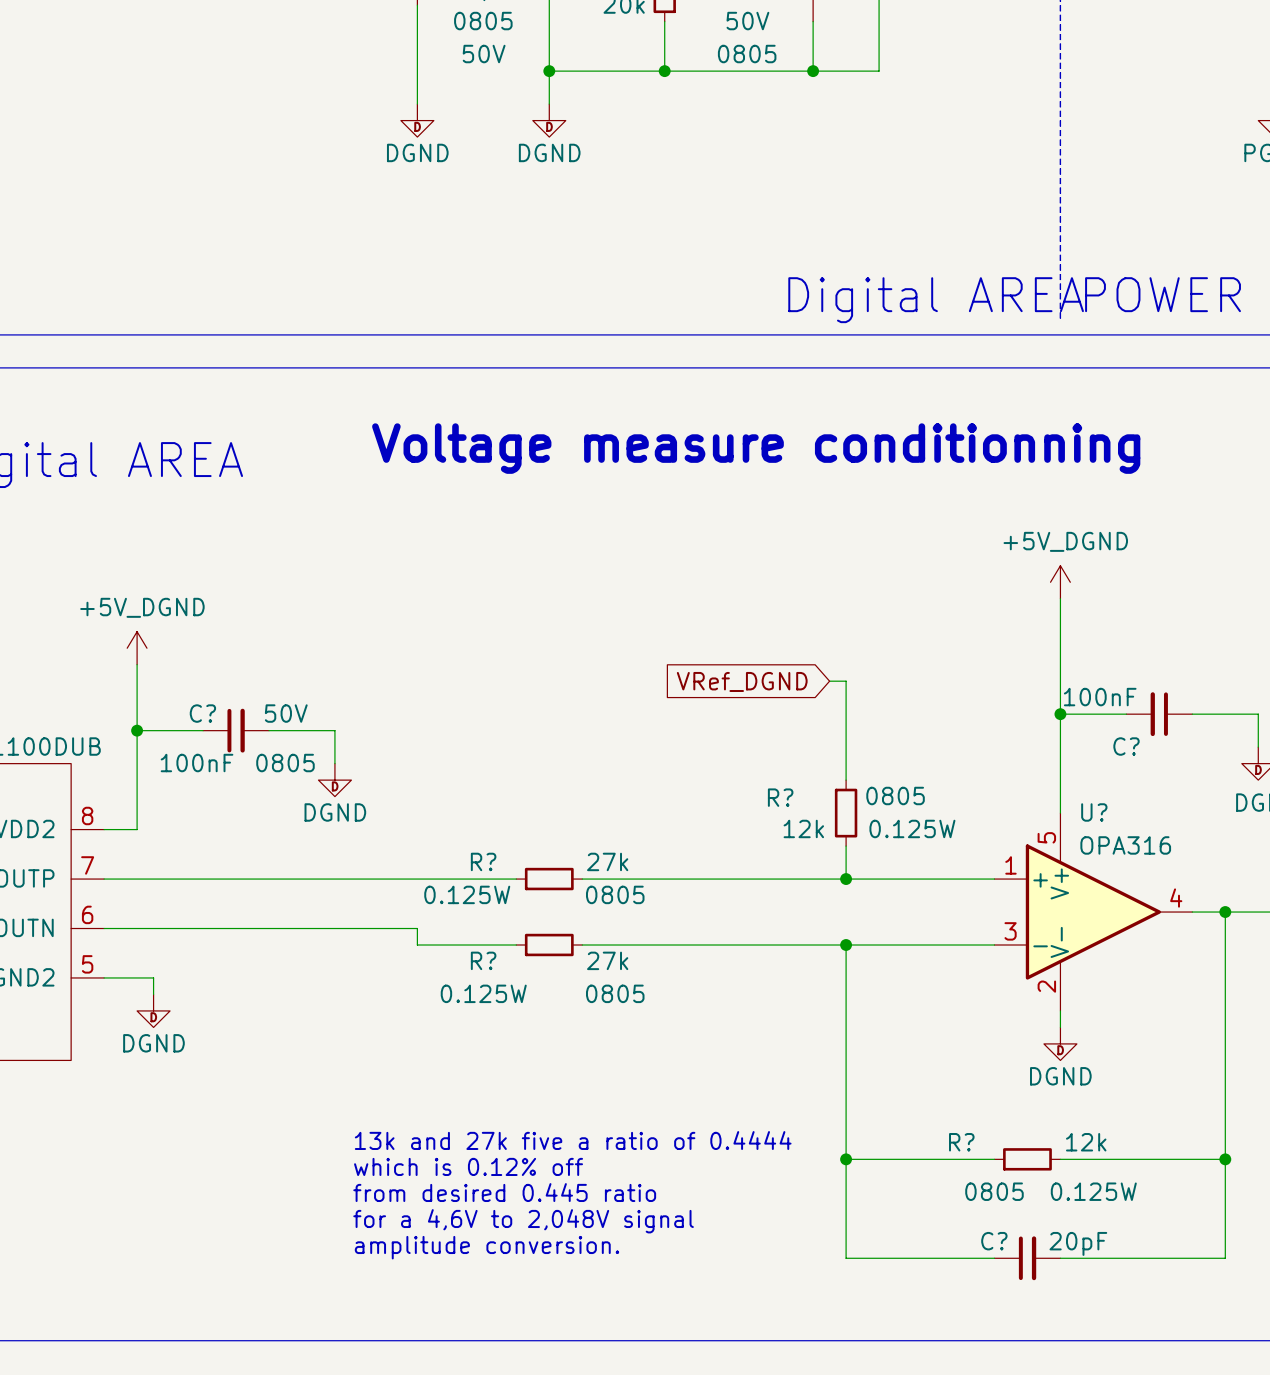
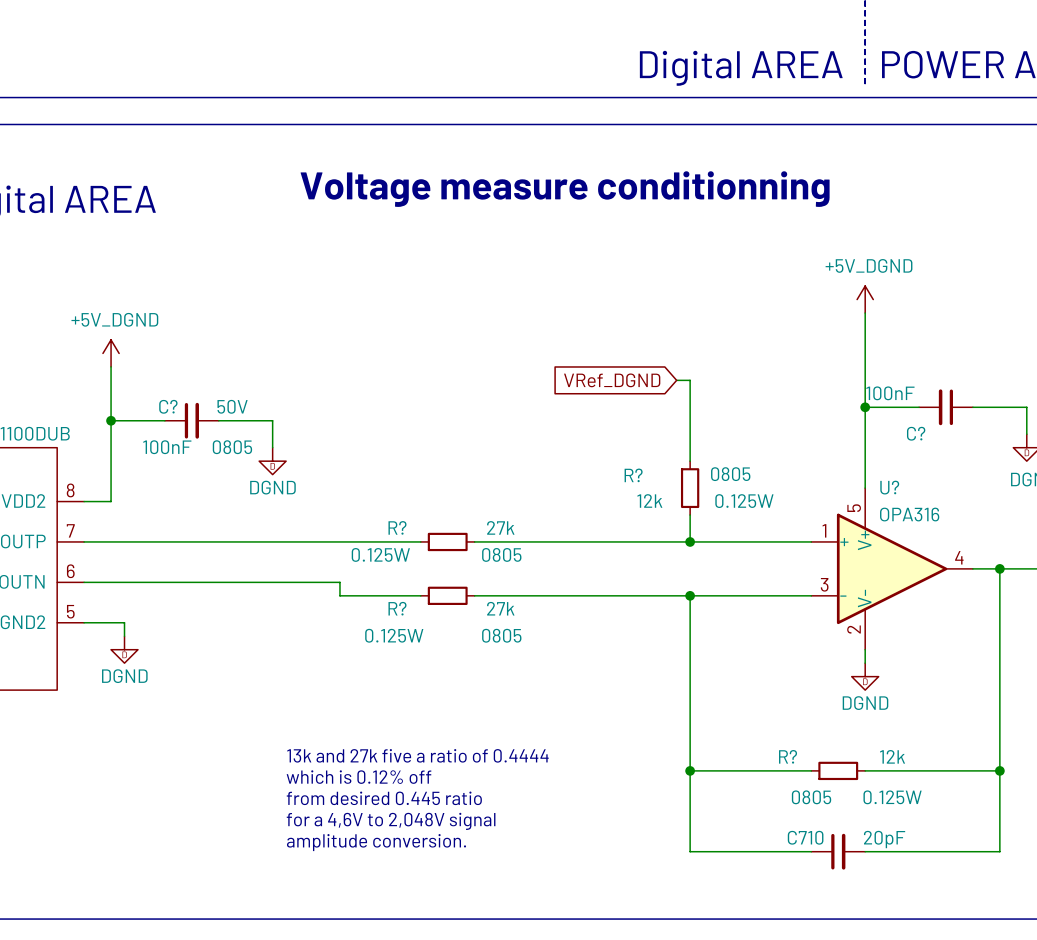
C? name: C? (994, 1241) -> C710 (805, 837)

